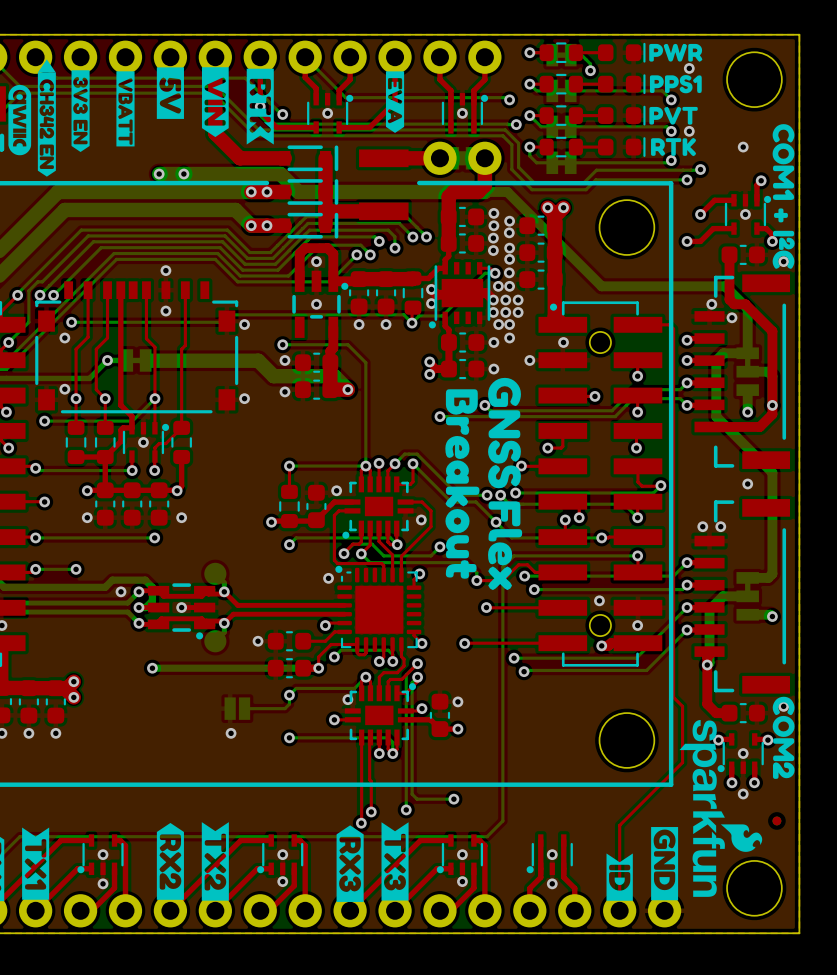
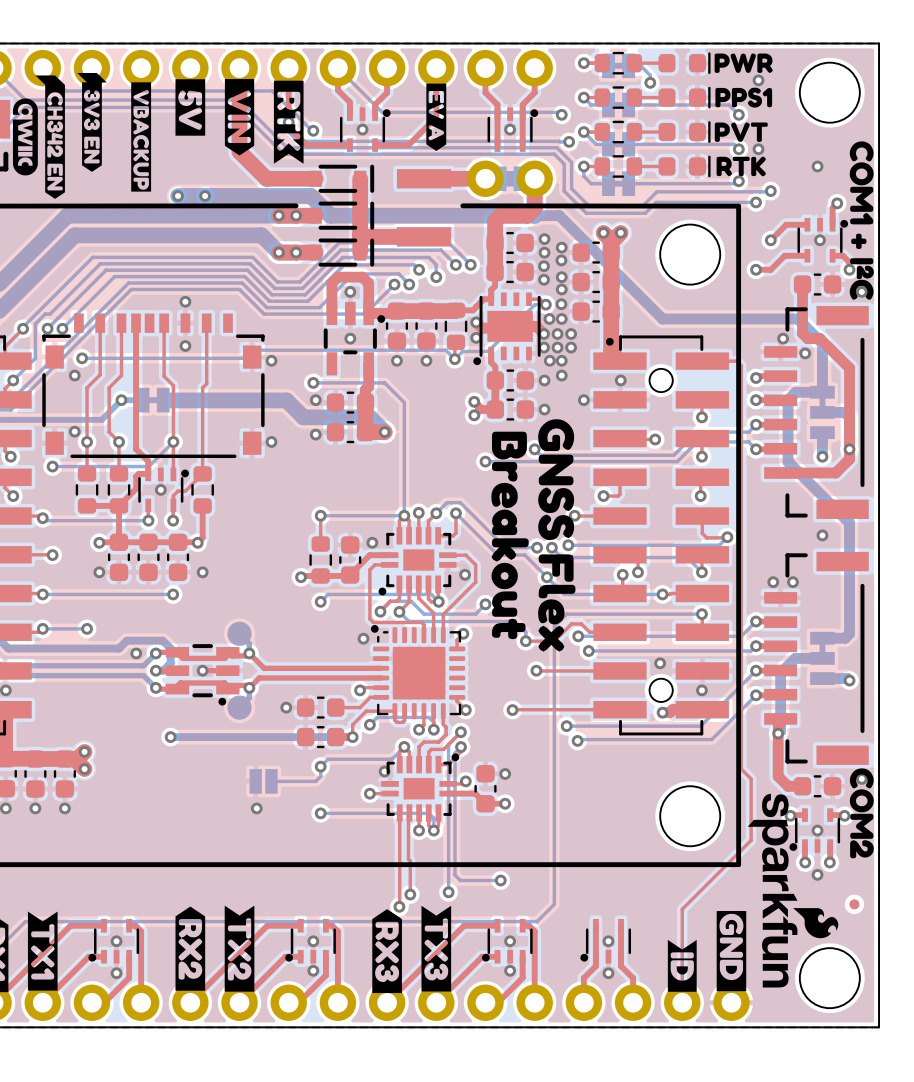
drawing shape: [37, 59, 56, 73] -> [35, 75, 65, 85]
drawing: none -> [77, 73, 107, 83]
drawing shape: [116, 71, 135, 147] -> [131, 82, 152, 192]

